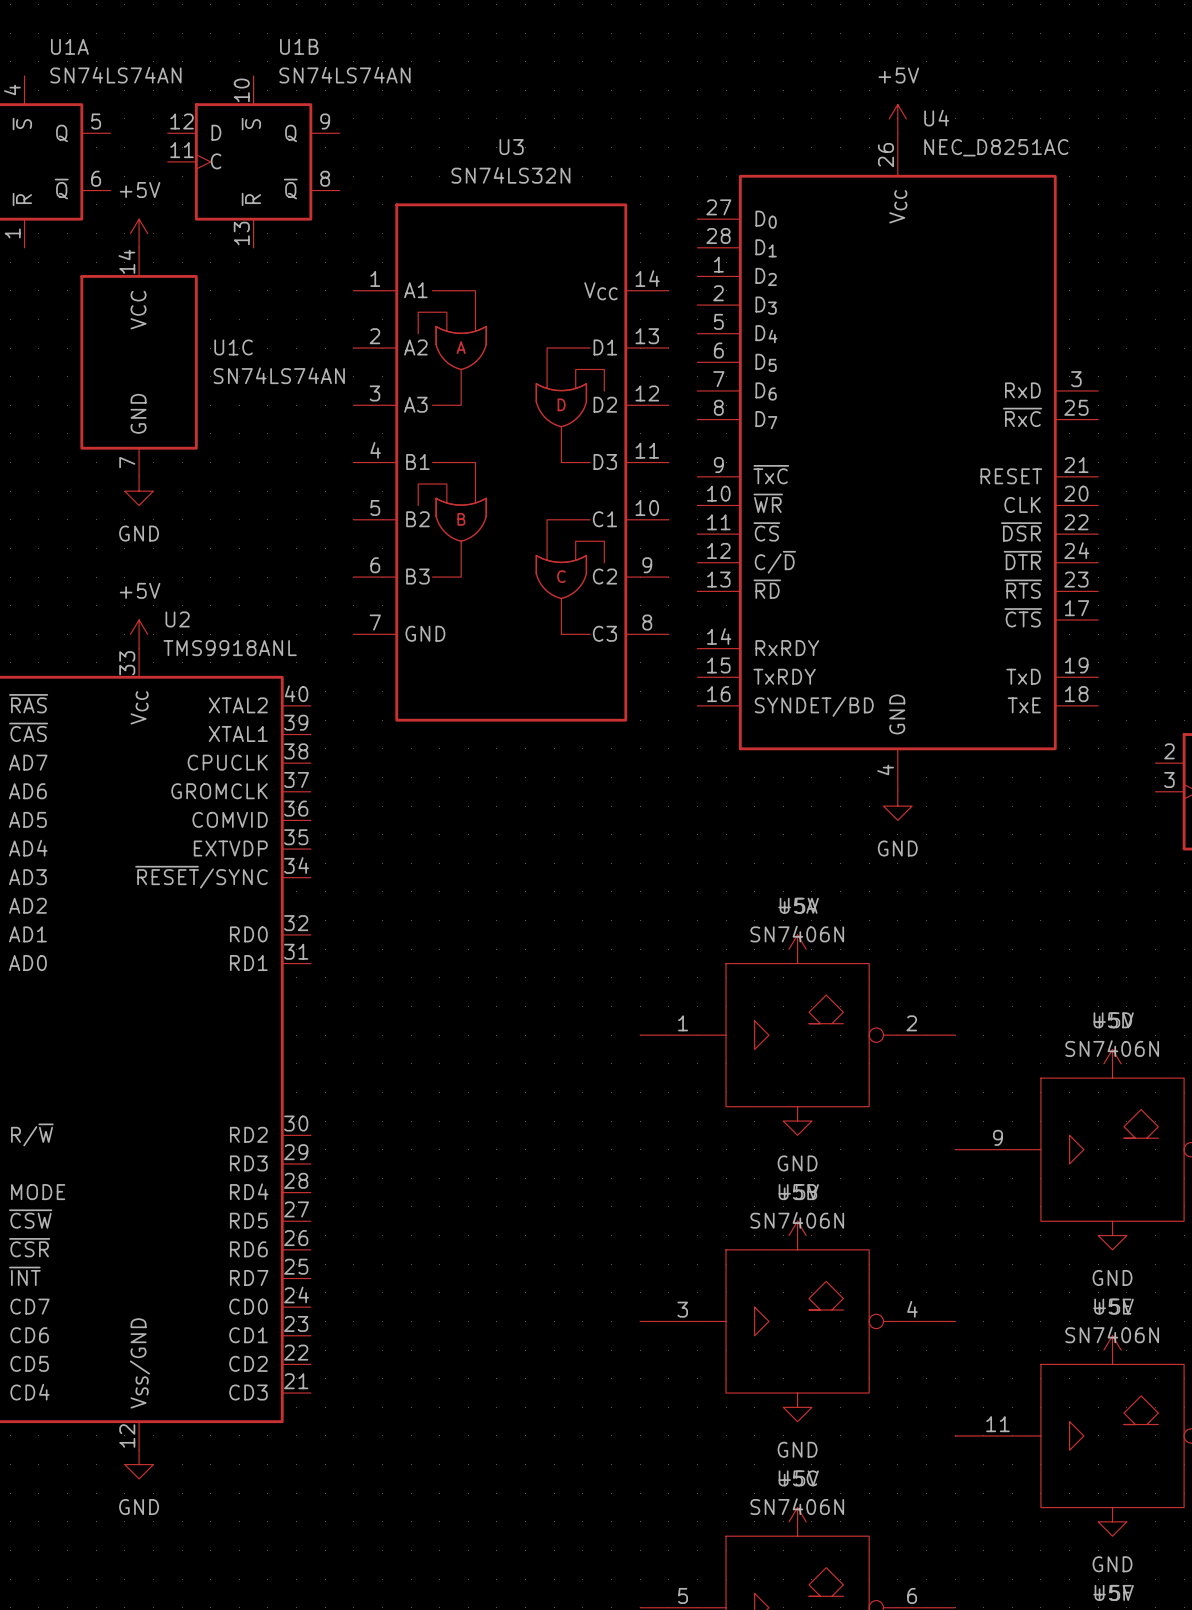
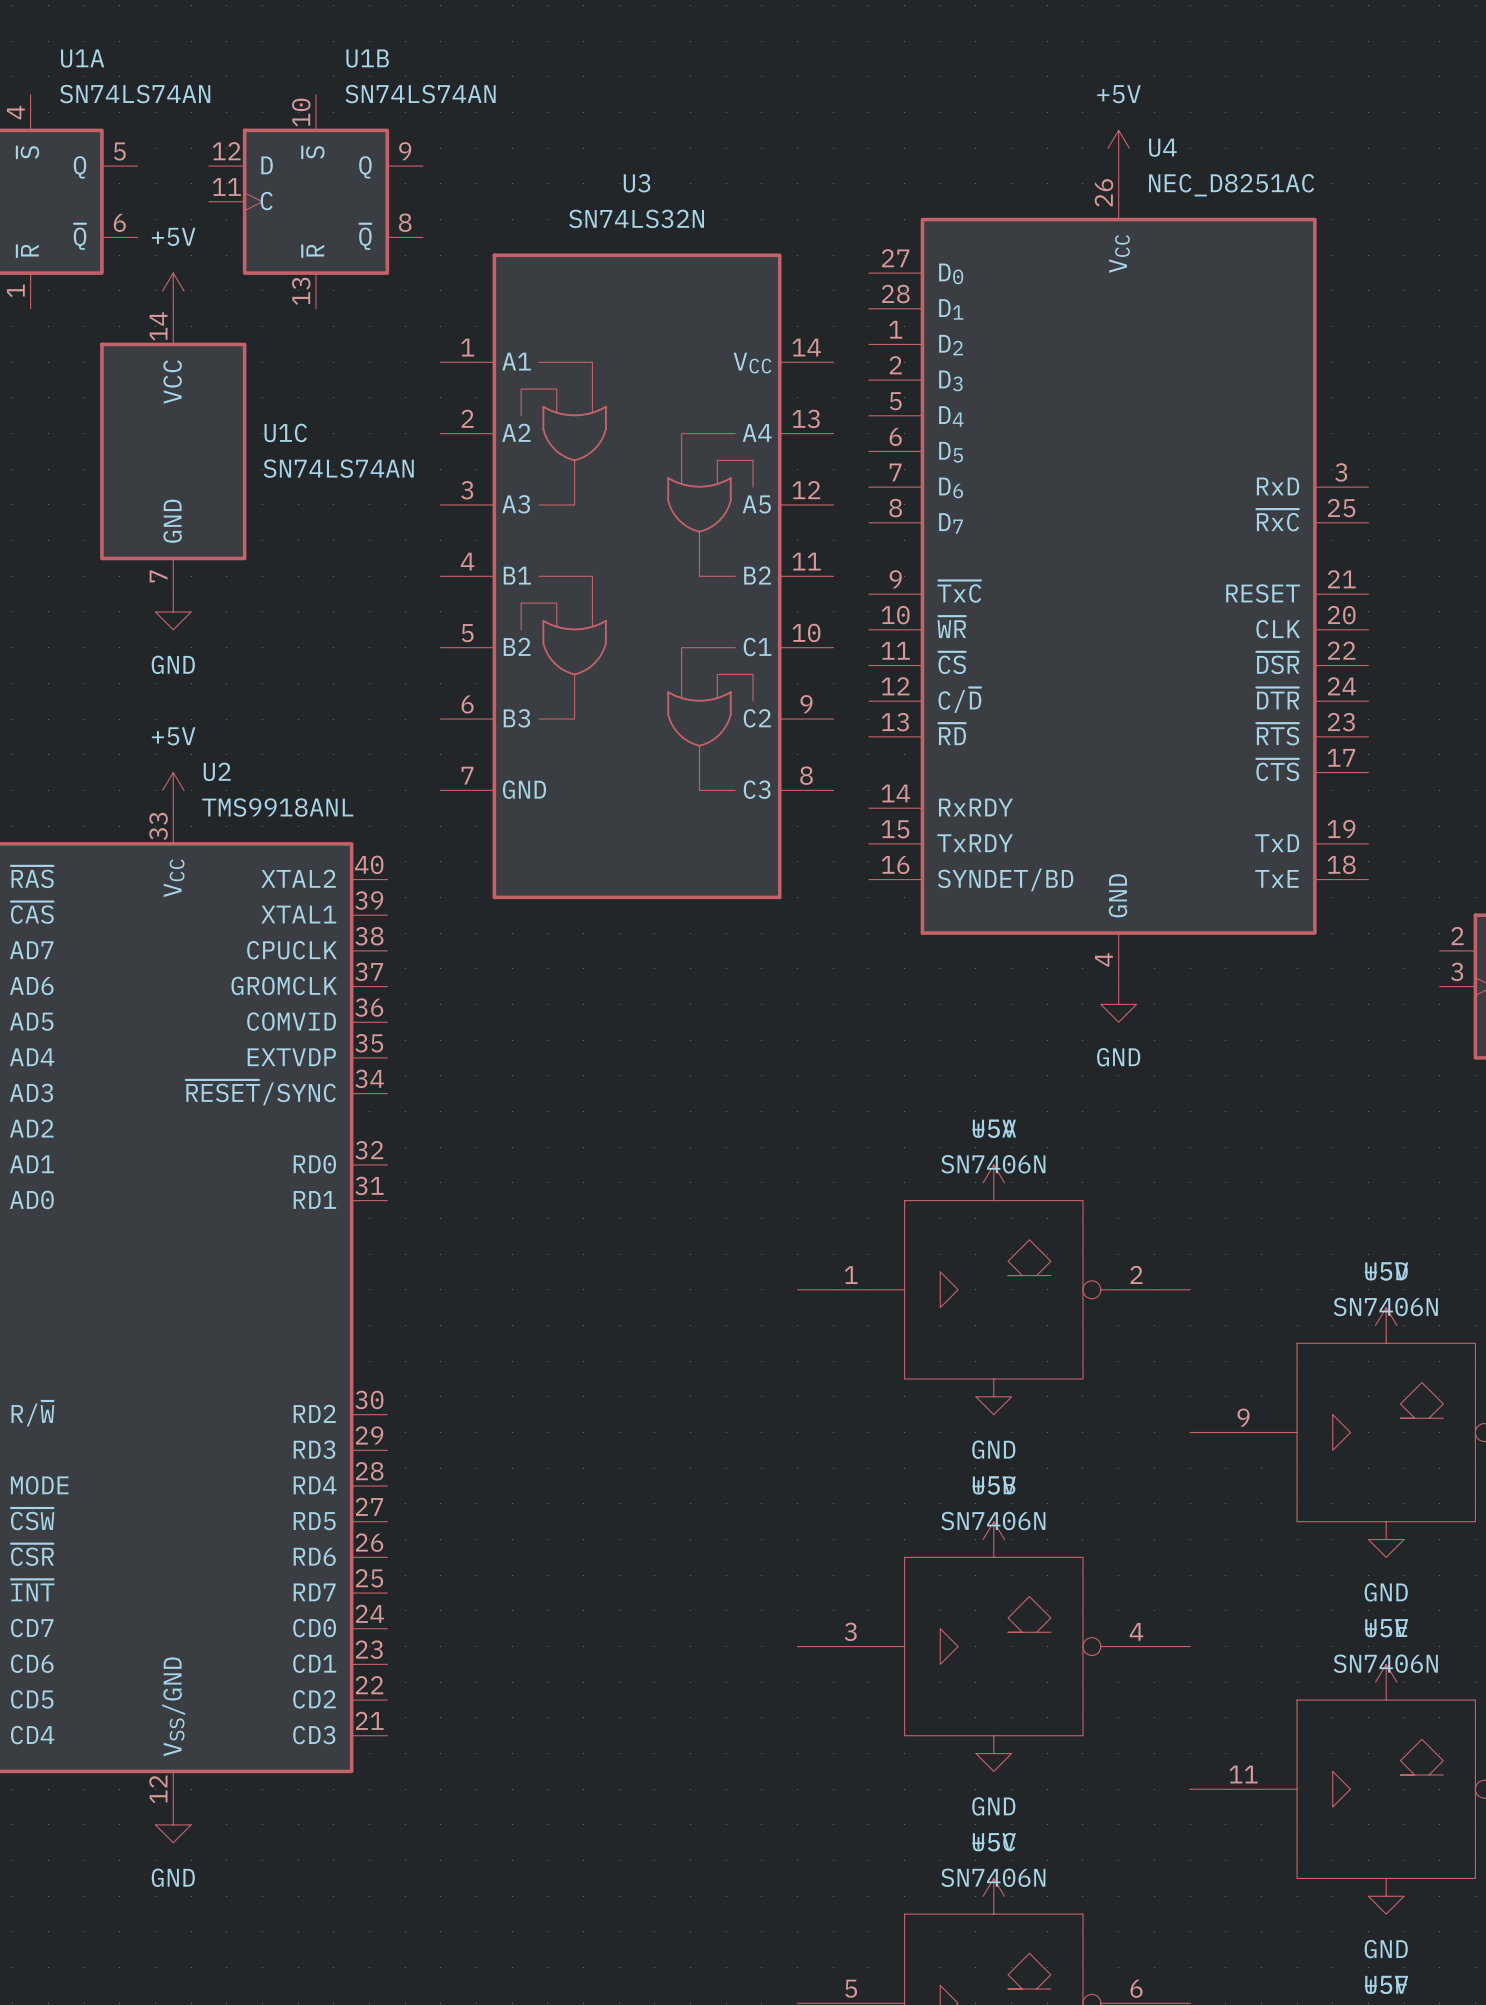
U3 text: A (461, 347) -> none
U3 pin name: D1 (605, 347) -> A4 (757, 432)
U3 text: D (561, 404) -> none
U3 pin name: D2 (605, 404) -> A5 (756, 504)
U3 pin name: D3 (605, 462) -> B2 (757, 575)
U3 text: B (461, 519) -> none
U3 text: C (561, 576) -> none

